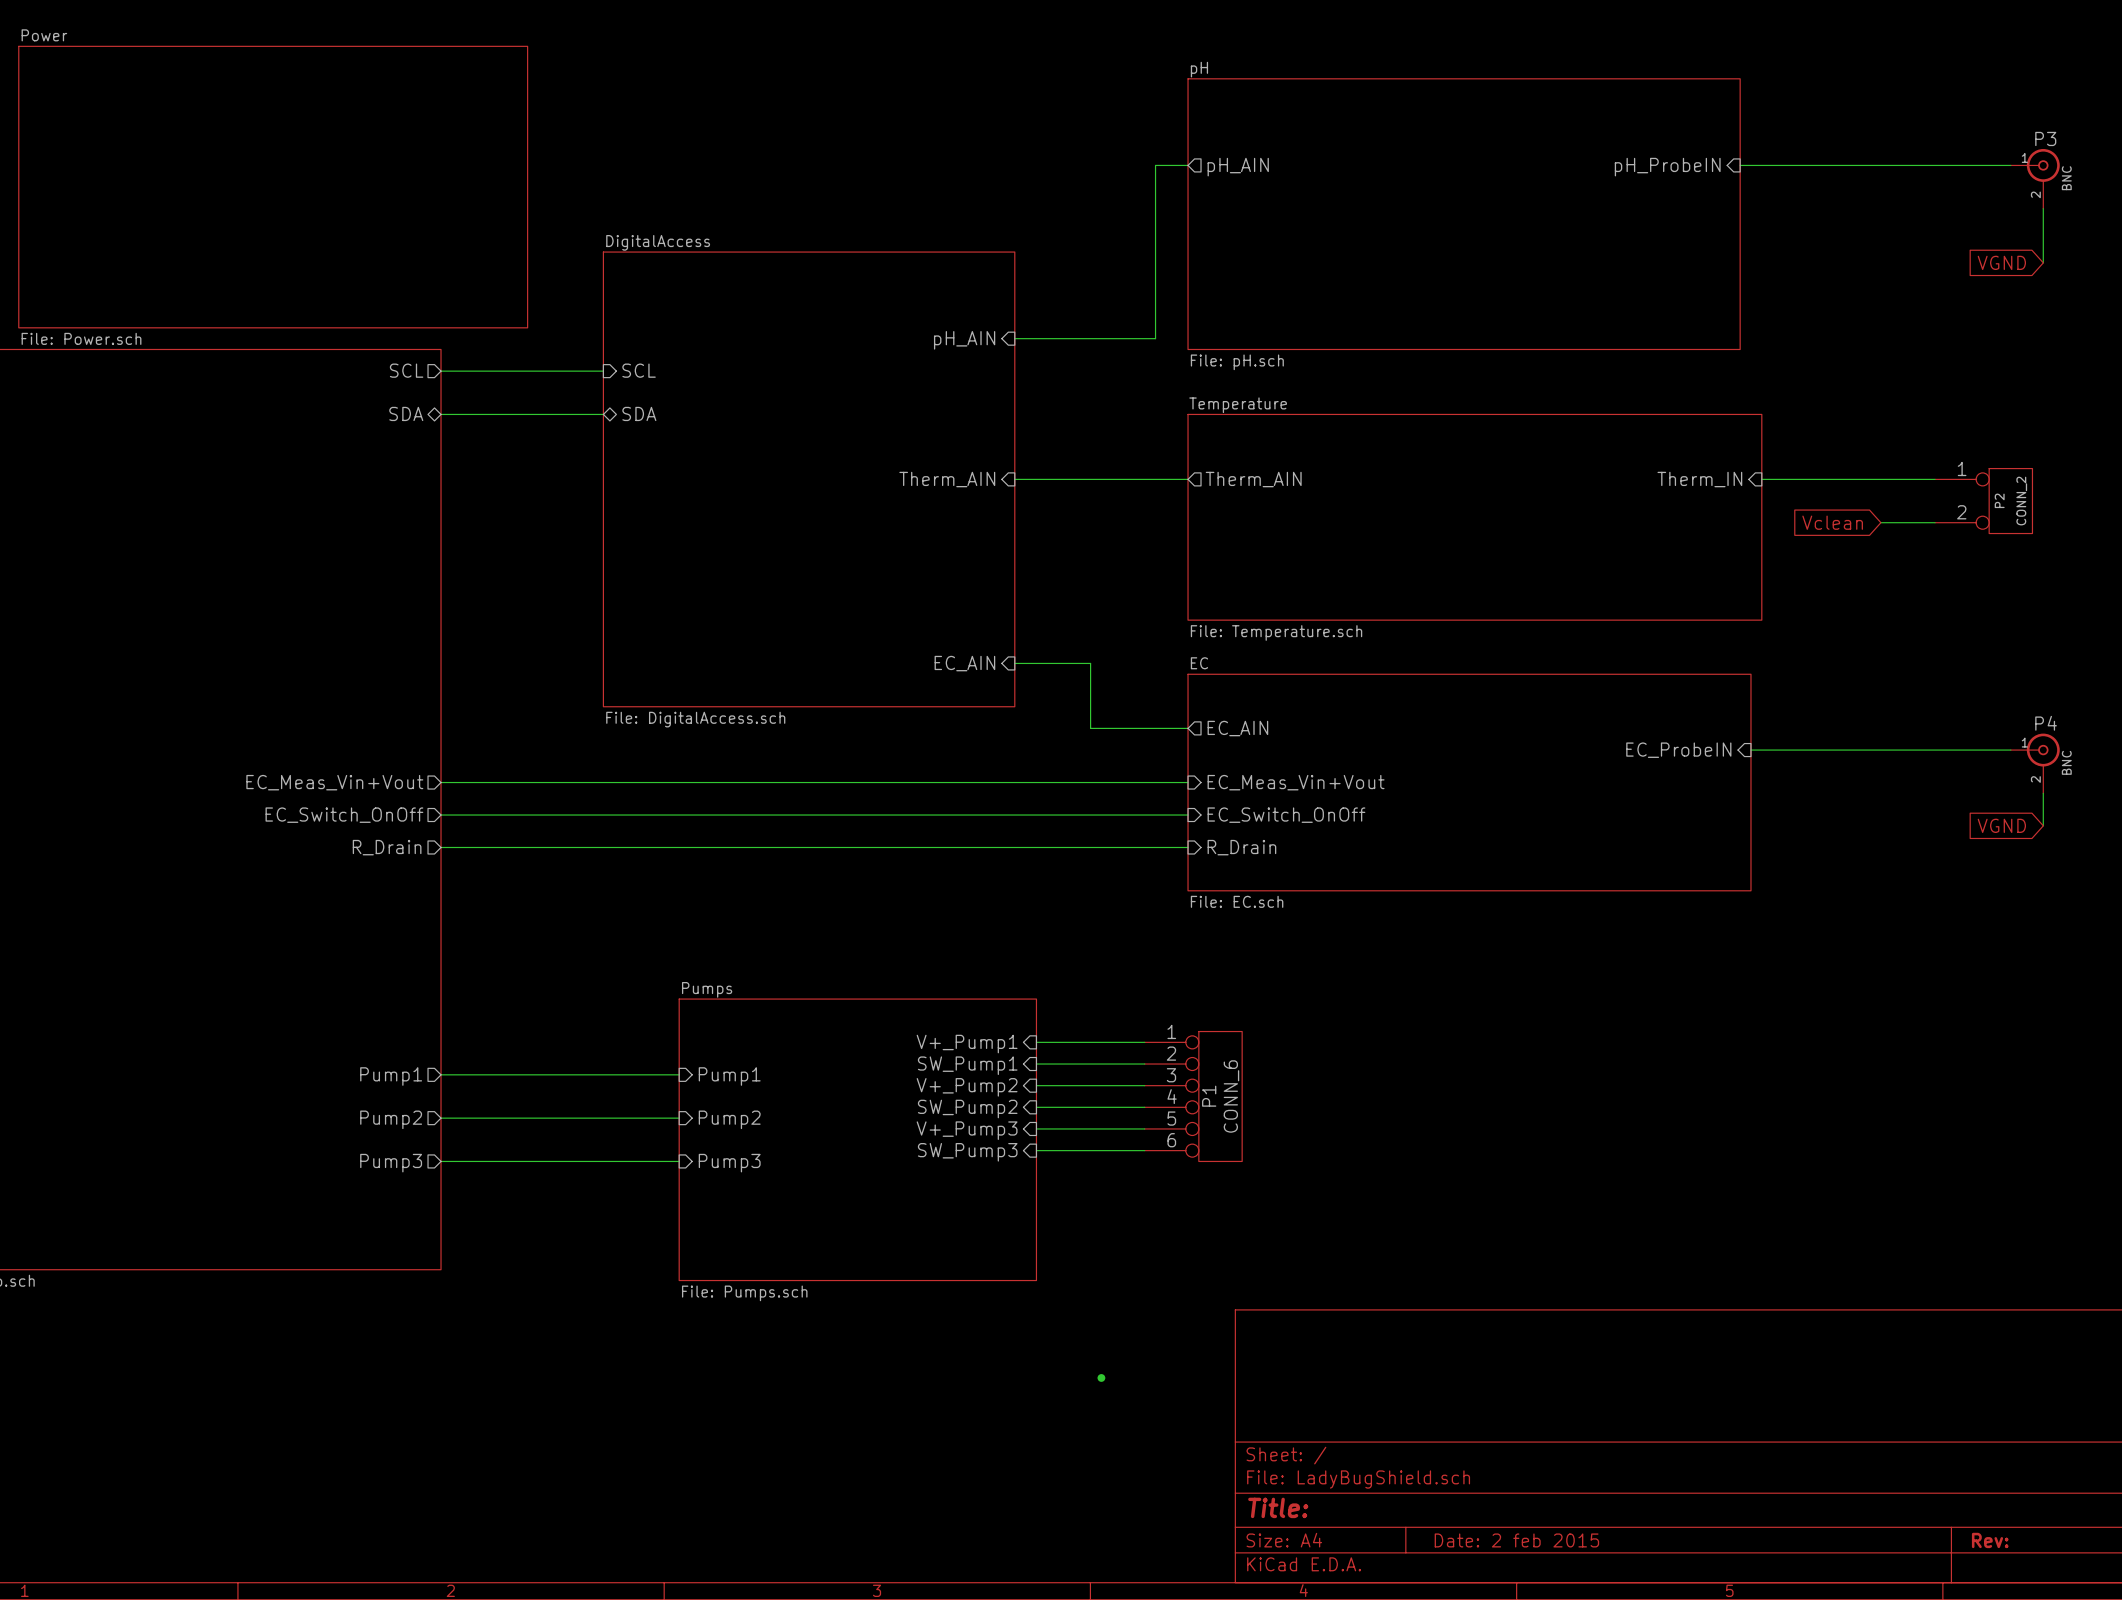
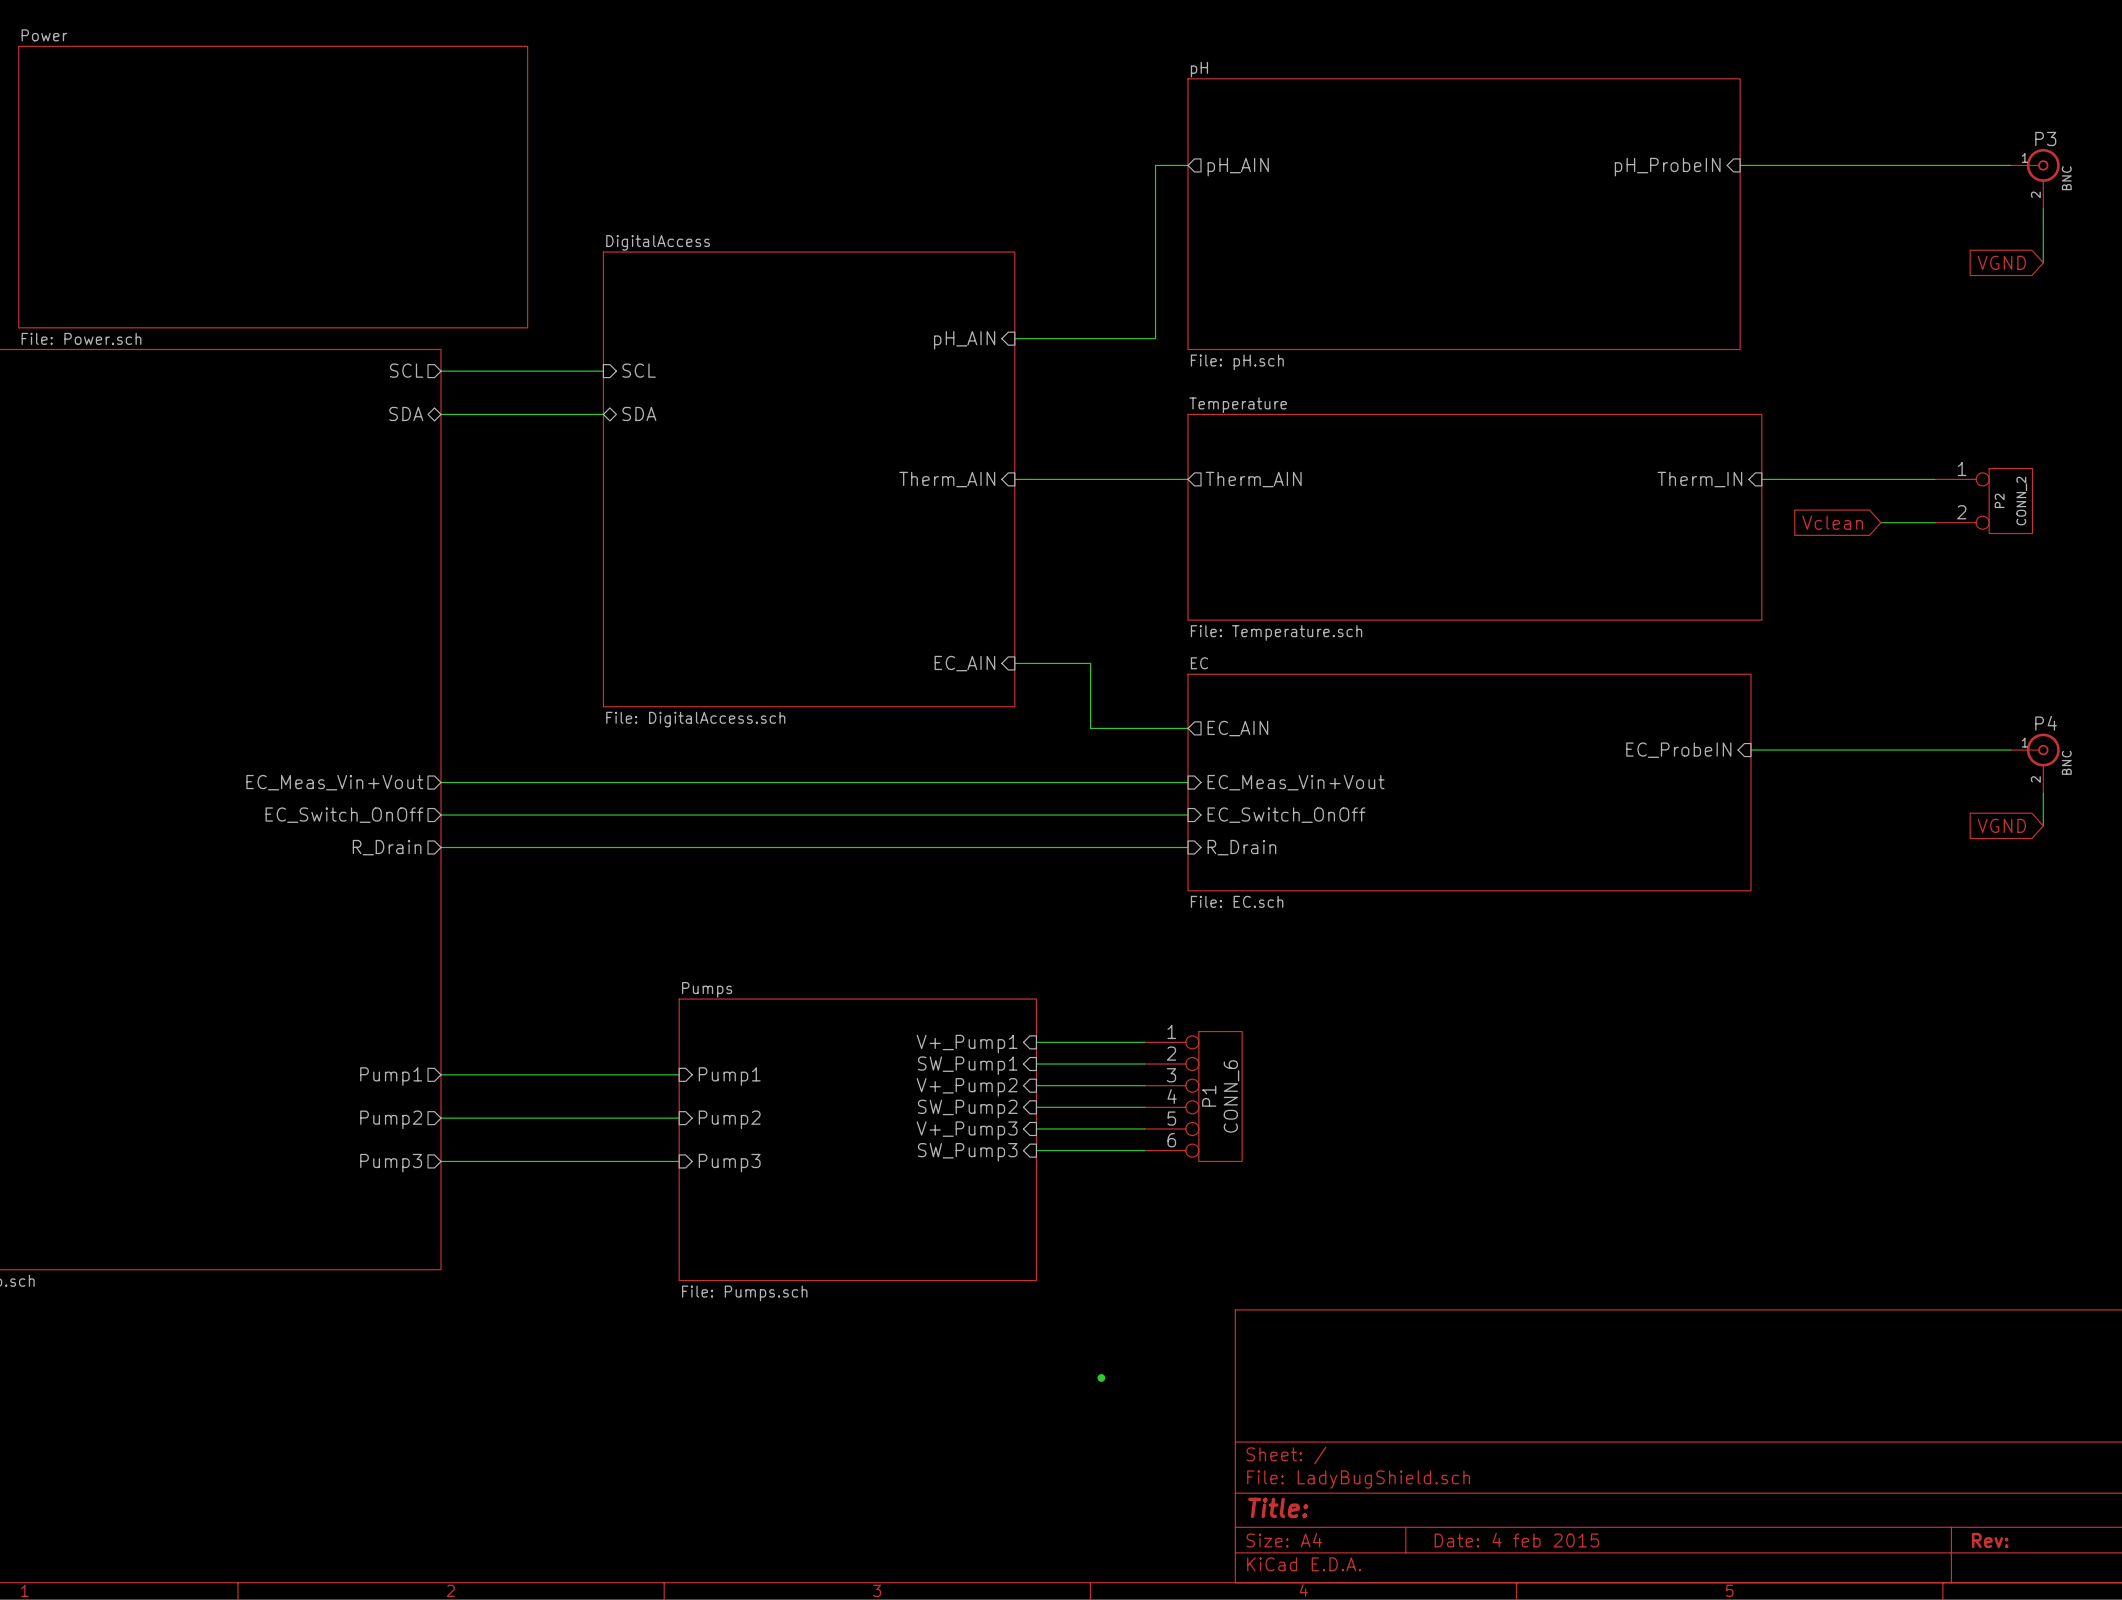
title block: Date: 2 feb 2015 (1516, 1540) -> Date: 4 feb 2015 (1516, 1540)

